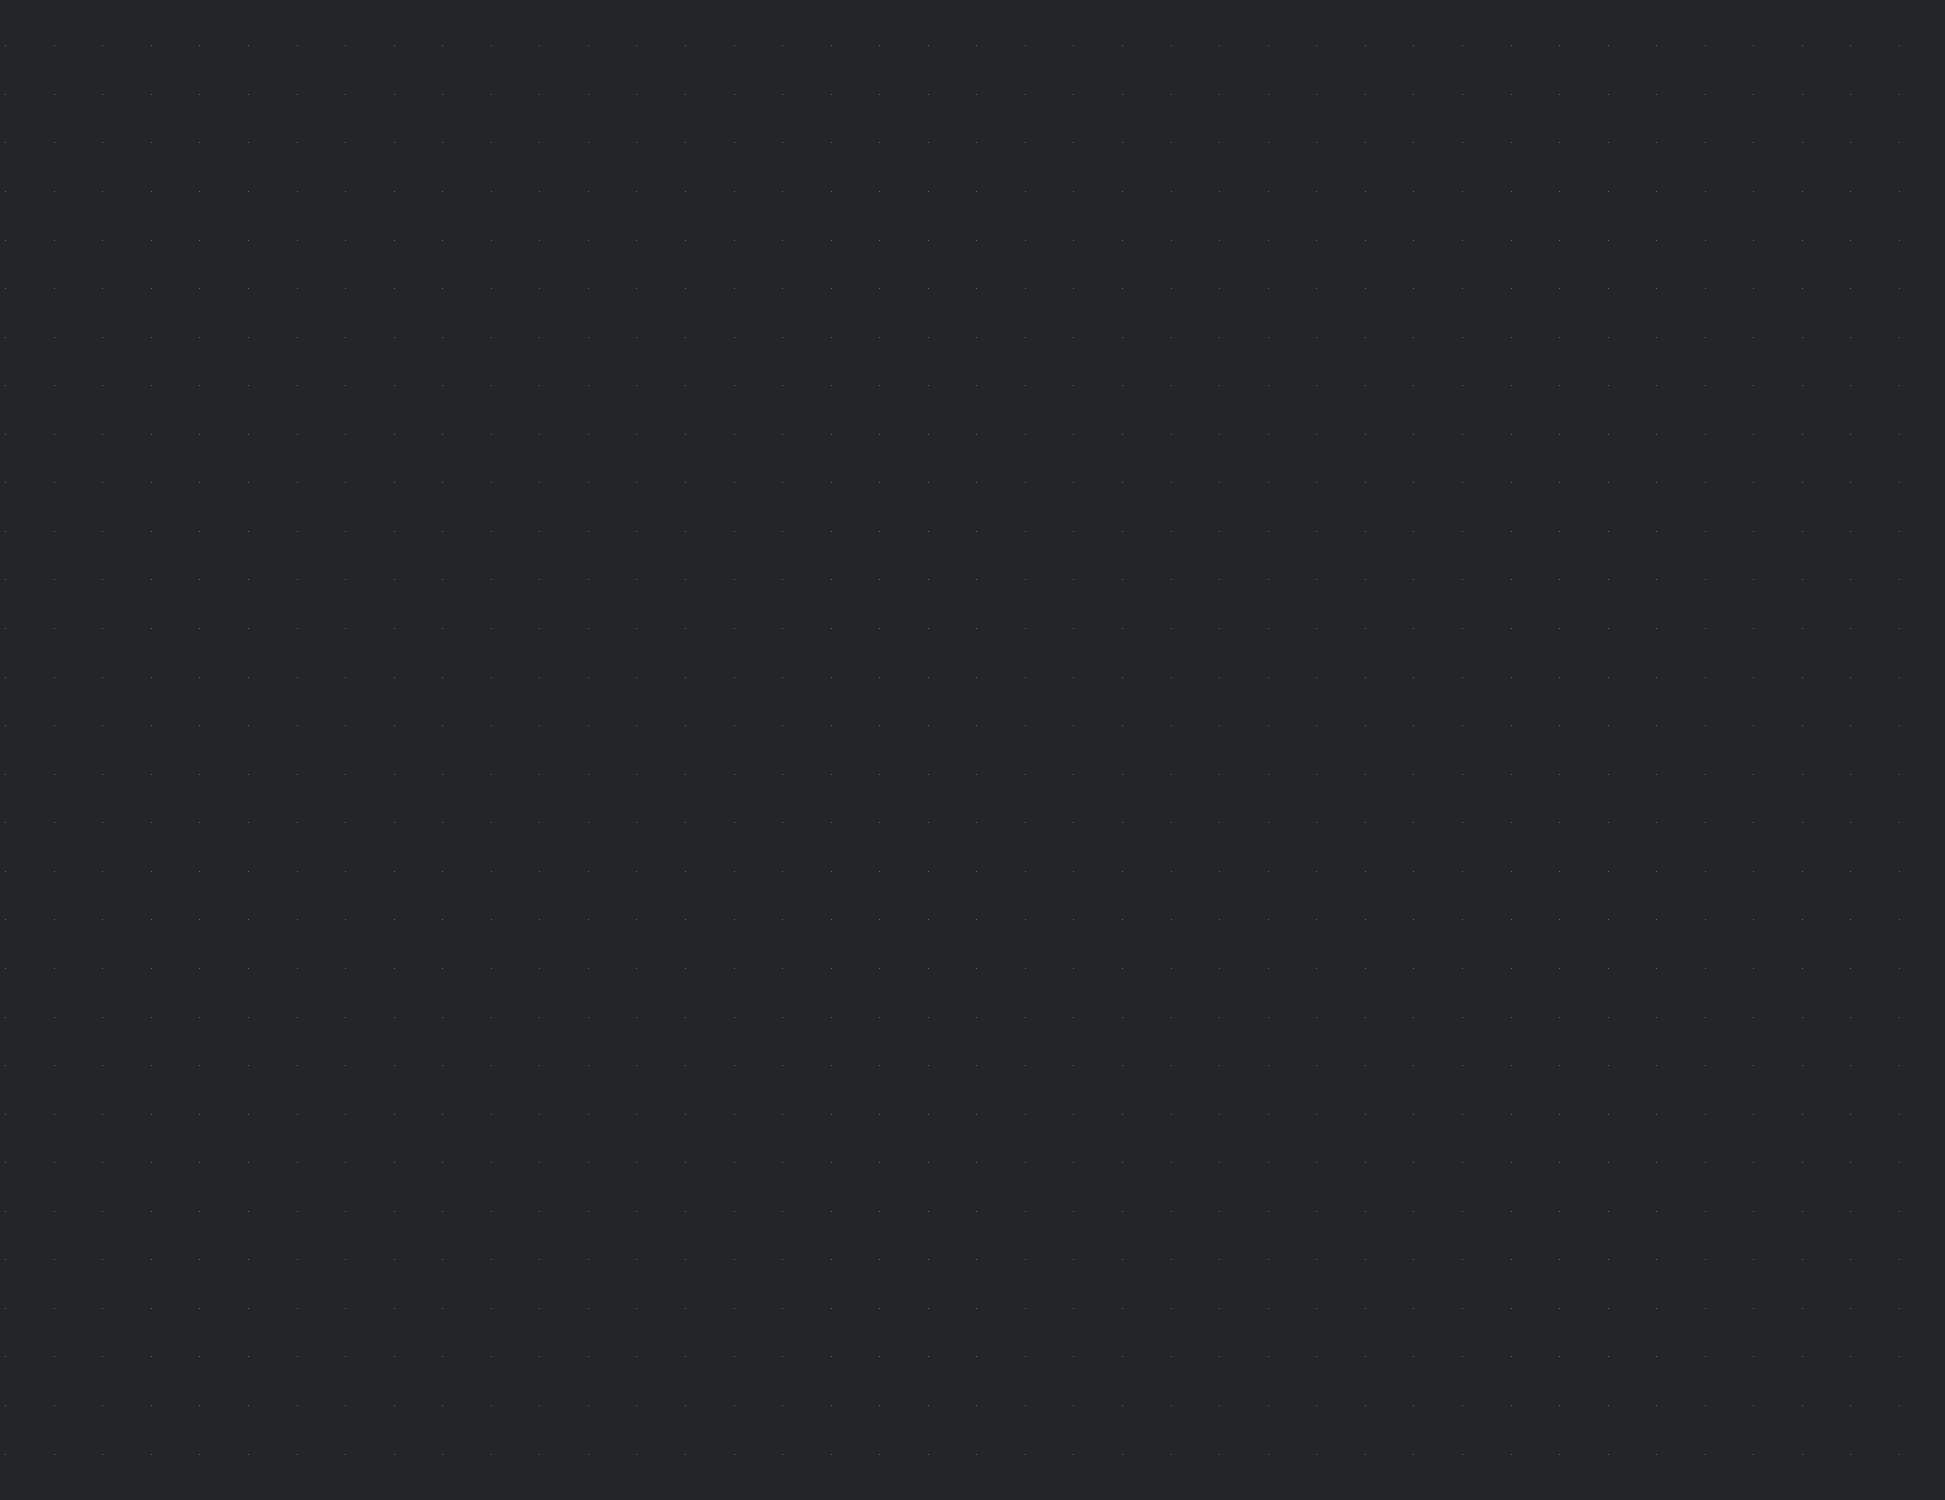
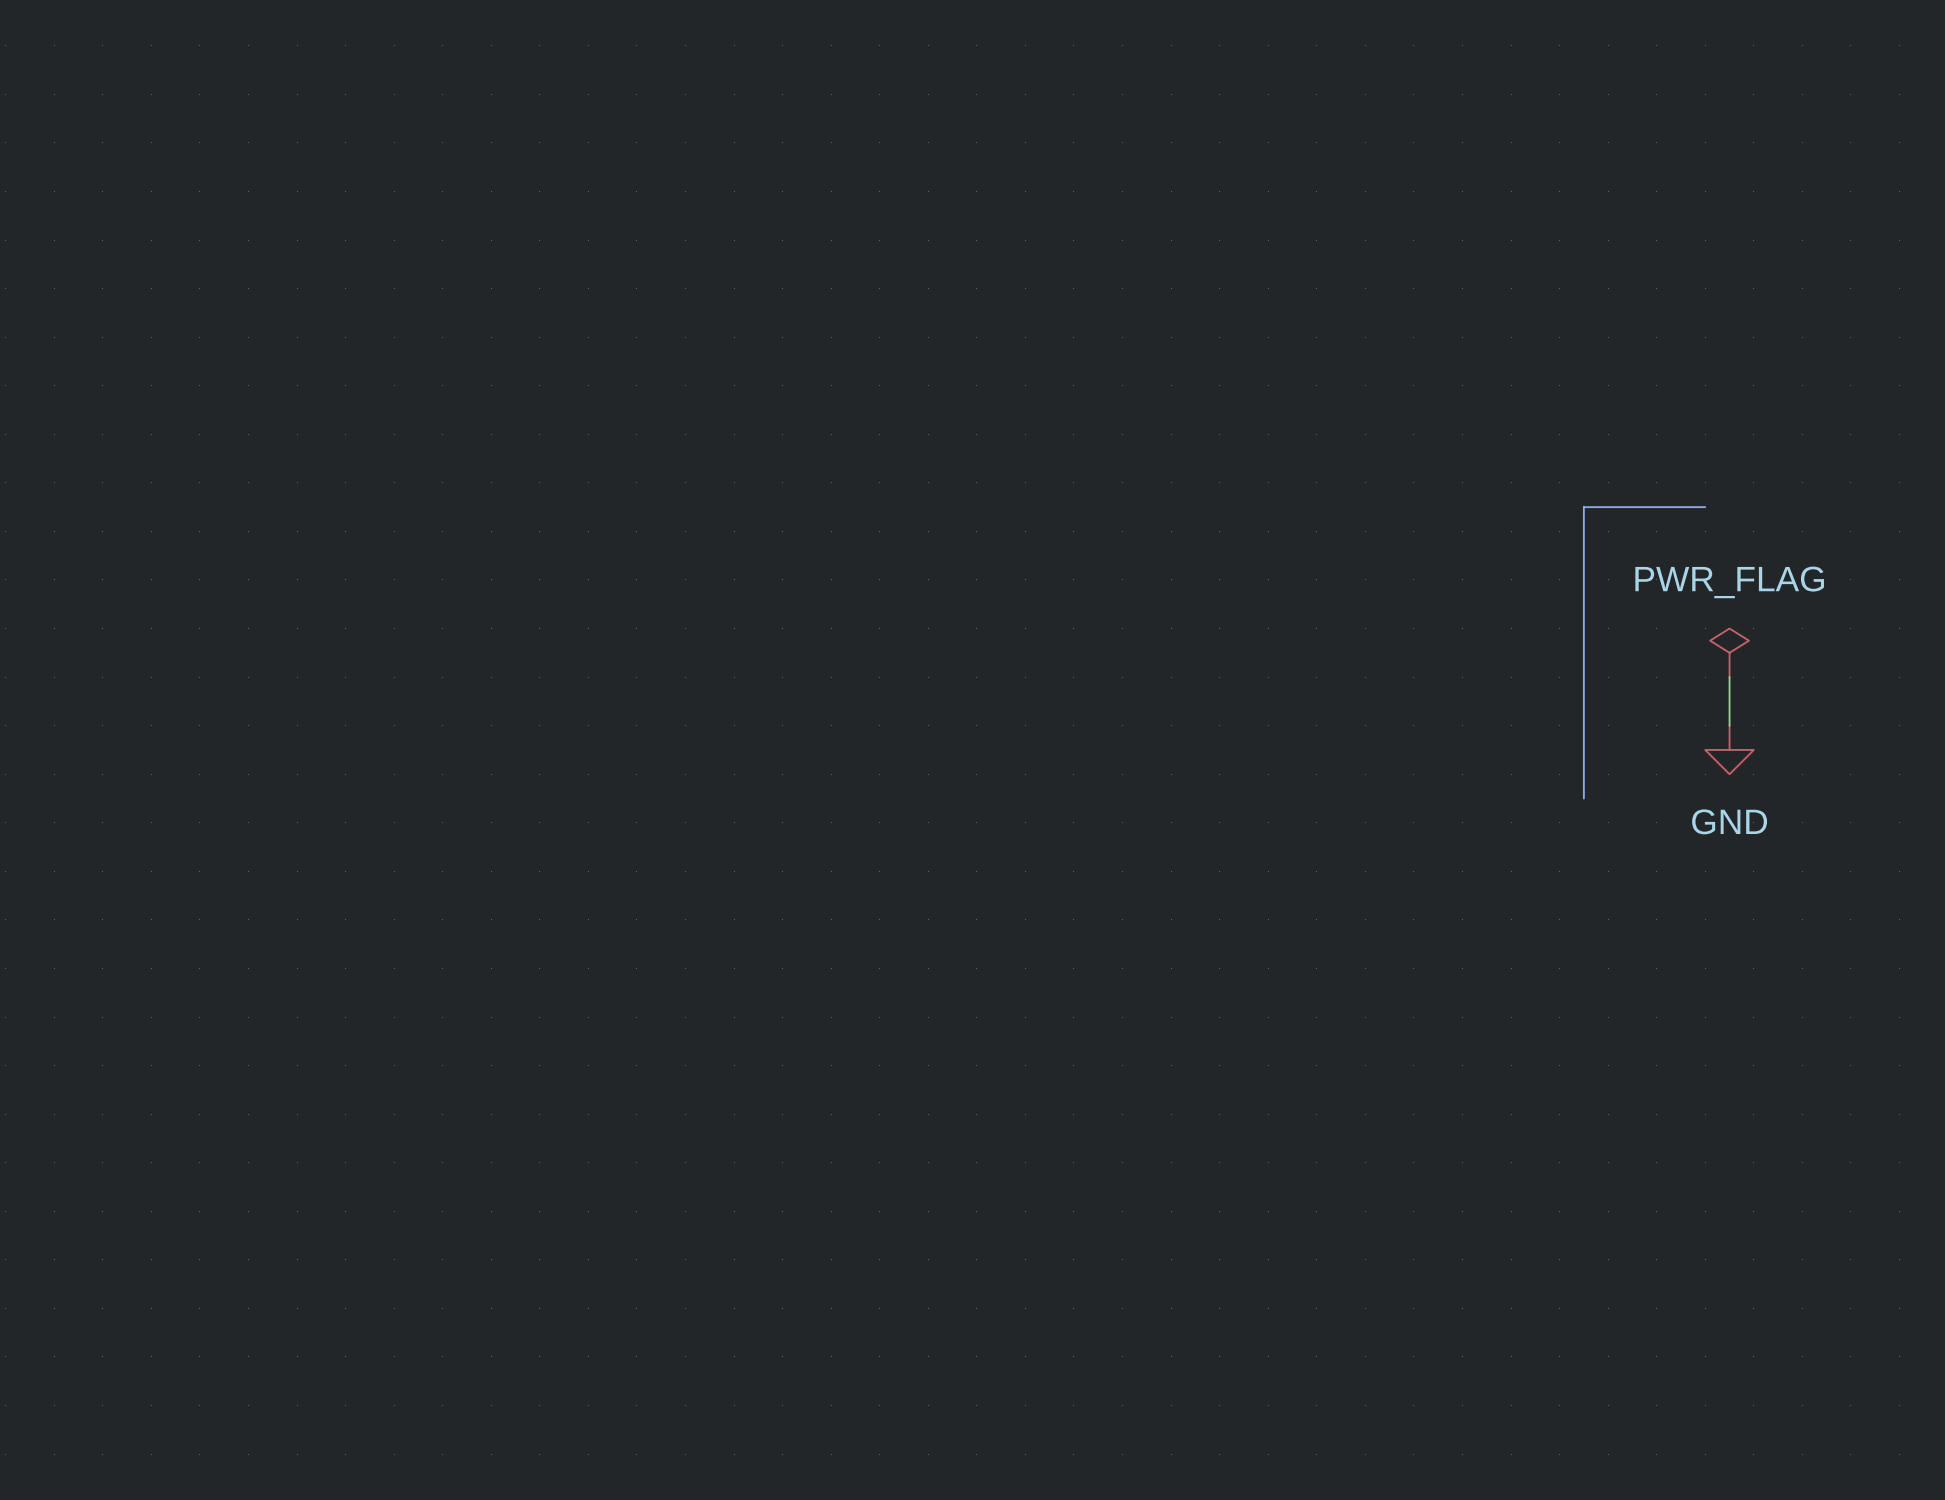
bus: none -> (1705, 507) (1583, 507) (1583, 798)
power symbol: none -> PWR_FLAG (1729, 652)
wire: none -> (1729, 677) (1729, 725)
power symbol: none -> GND (1729, 749)

